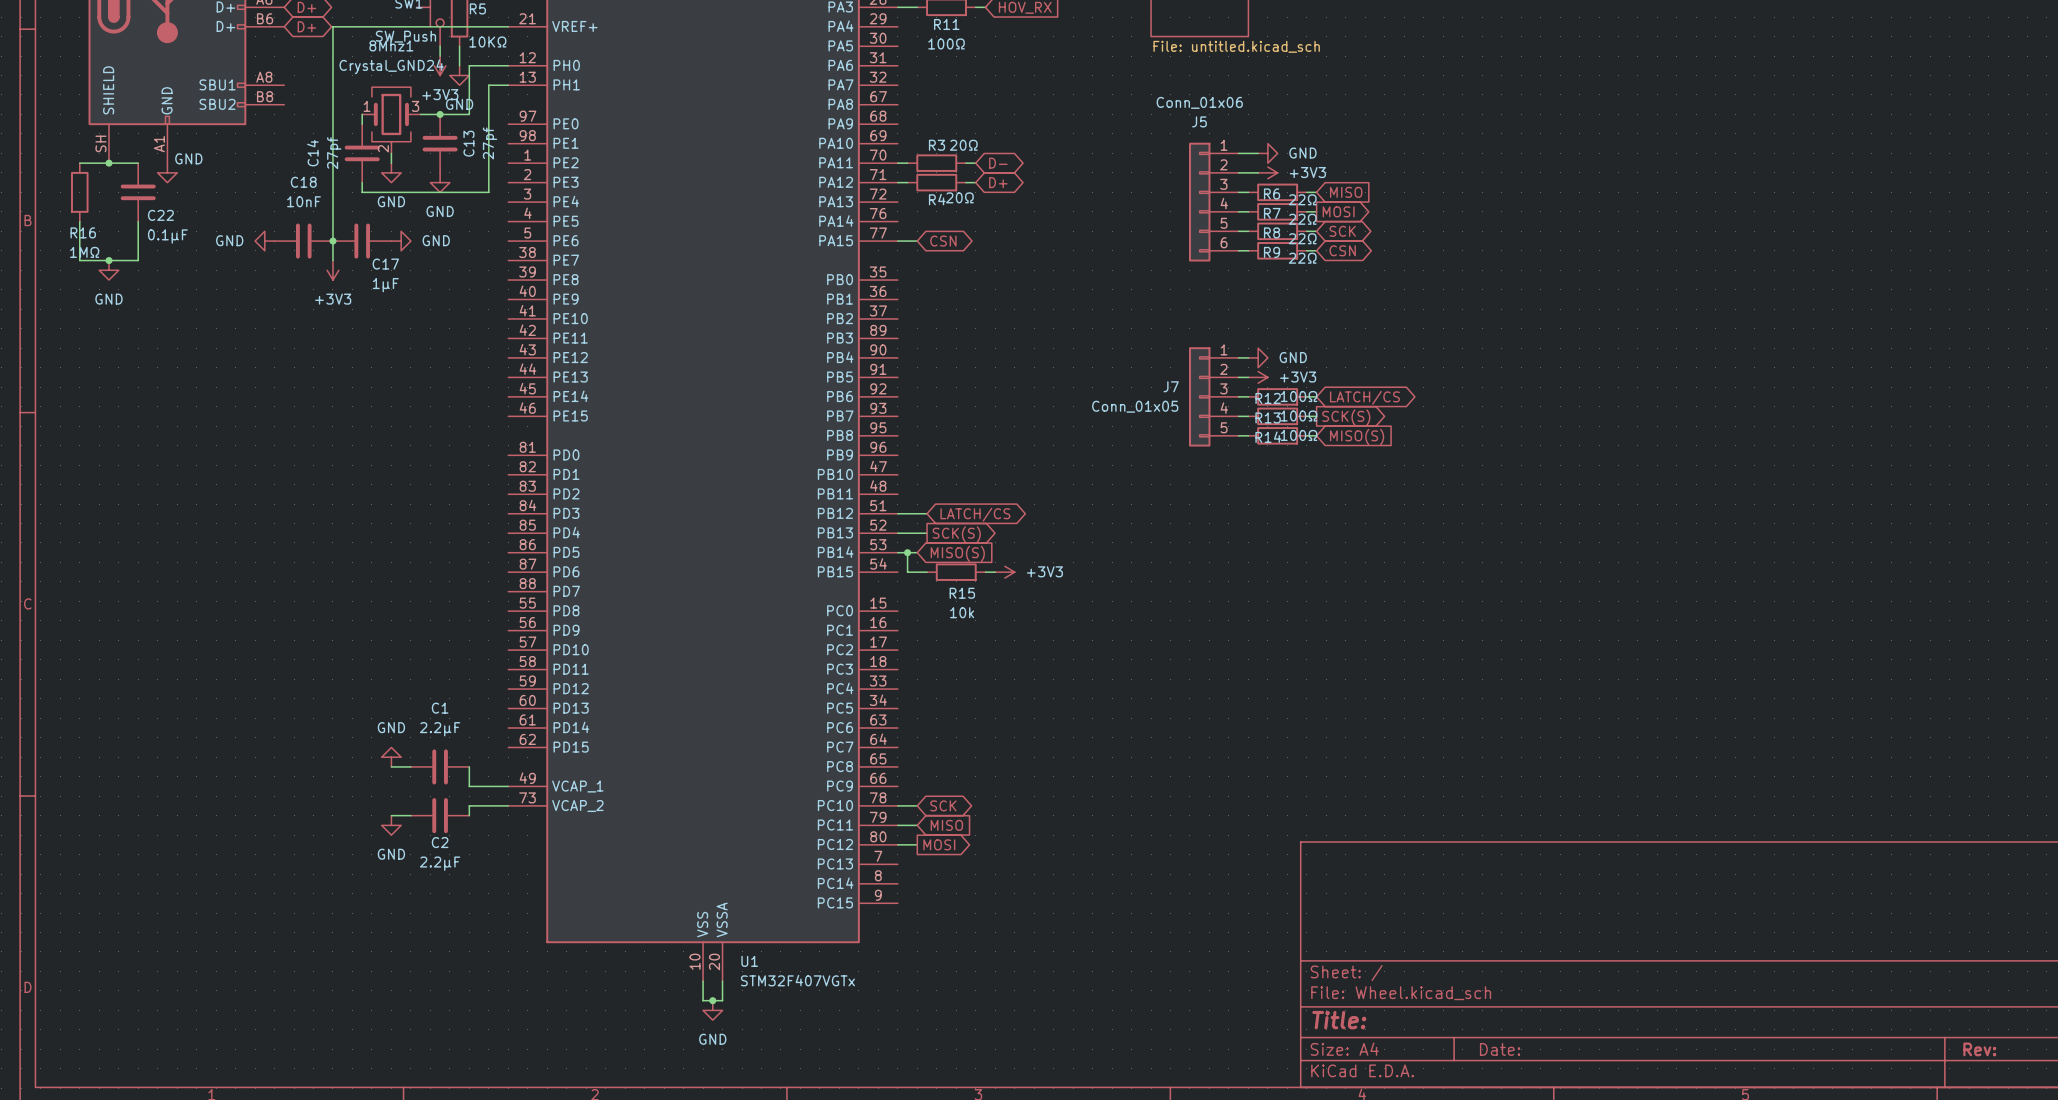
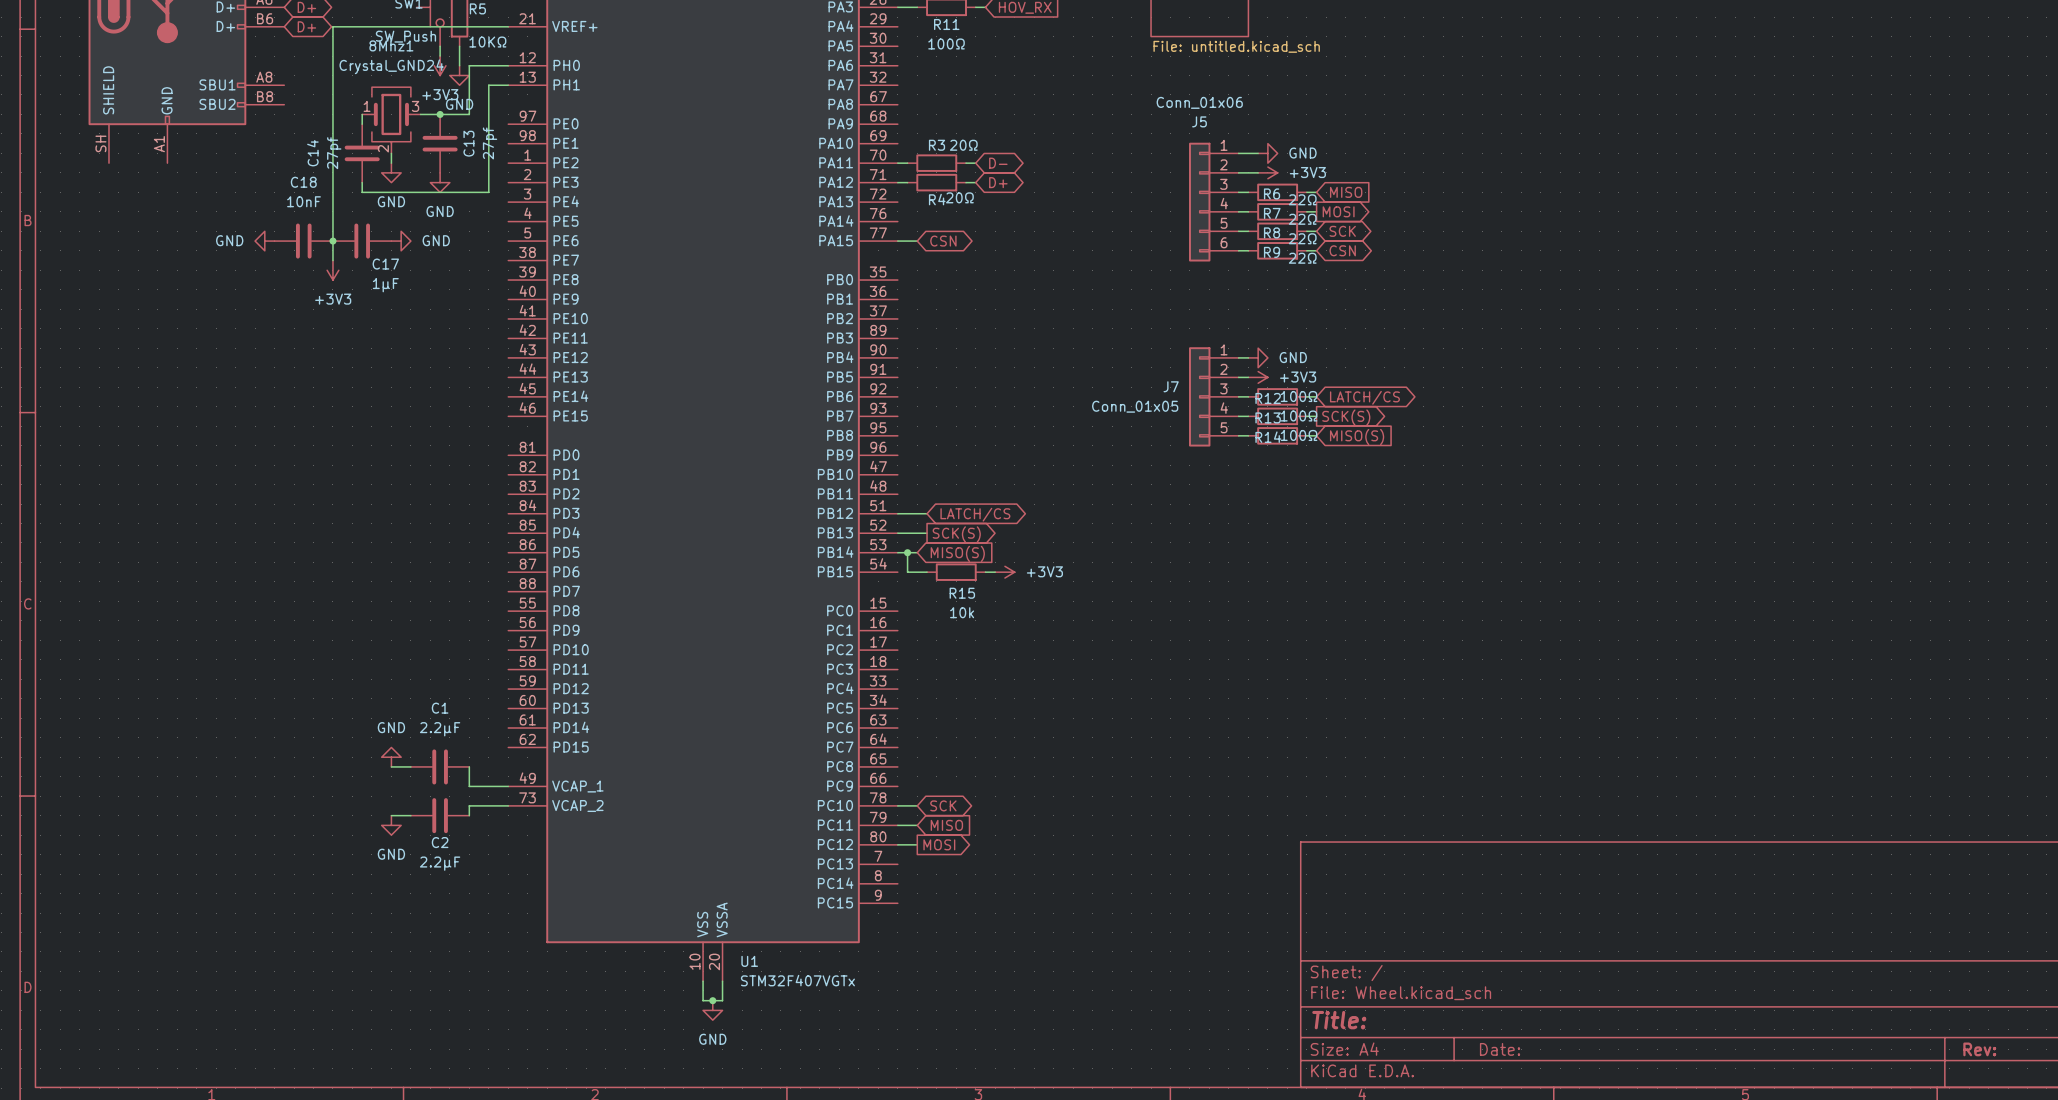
wire: (79, 163) (138, 163) -> none
junction: (108, 163) -> none
power symbol: GND (167, 172) -> none
R16: 1MΩ (79, 192) -> none
C22: 0.1µF (138, 192) -> none
wire: (79, 221) (79, 260) (138, 260) (138, 221) -> none
junction: (108, 260) -> none
power symbol: GND (108, 270) -> none

